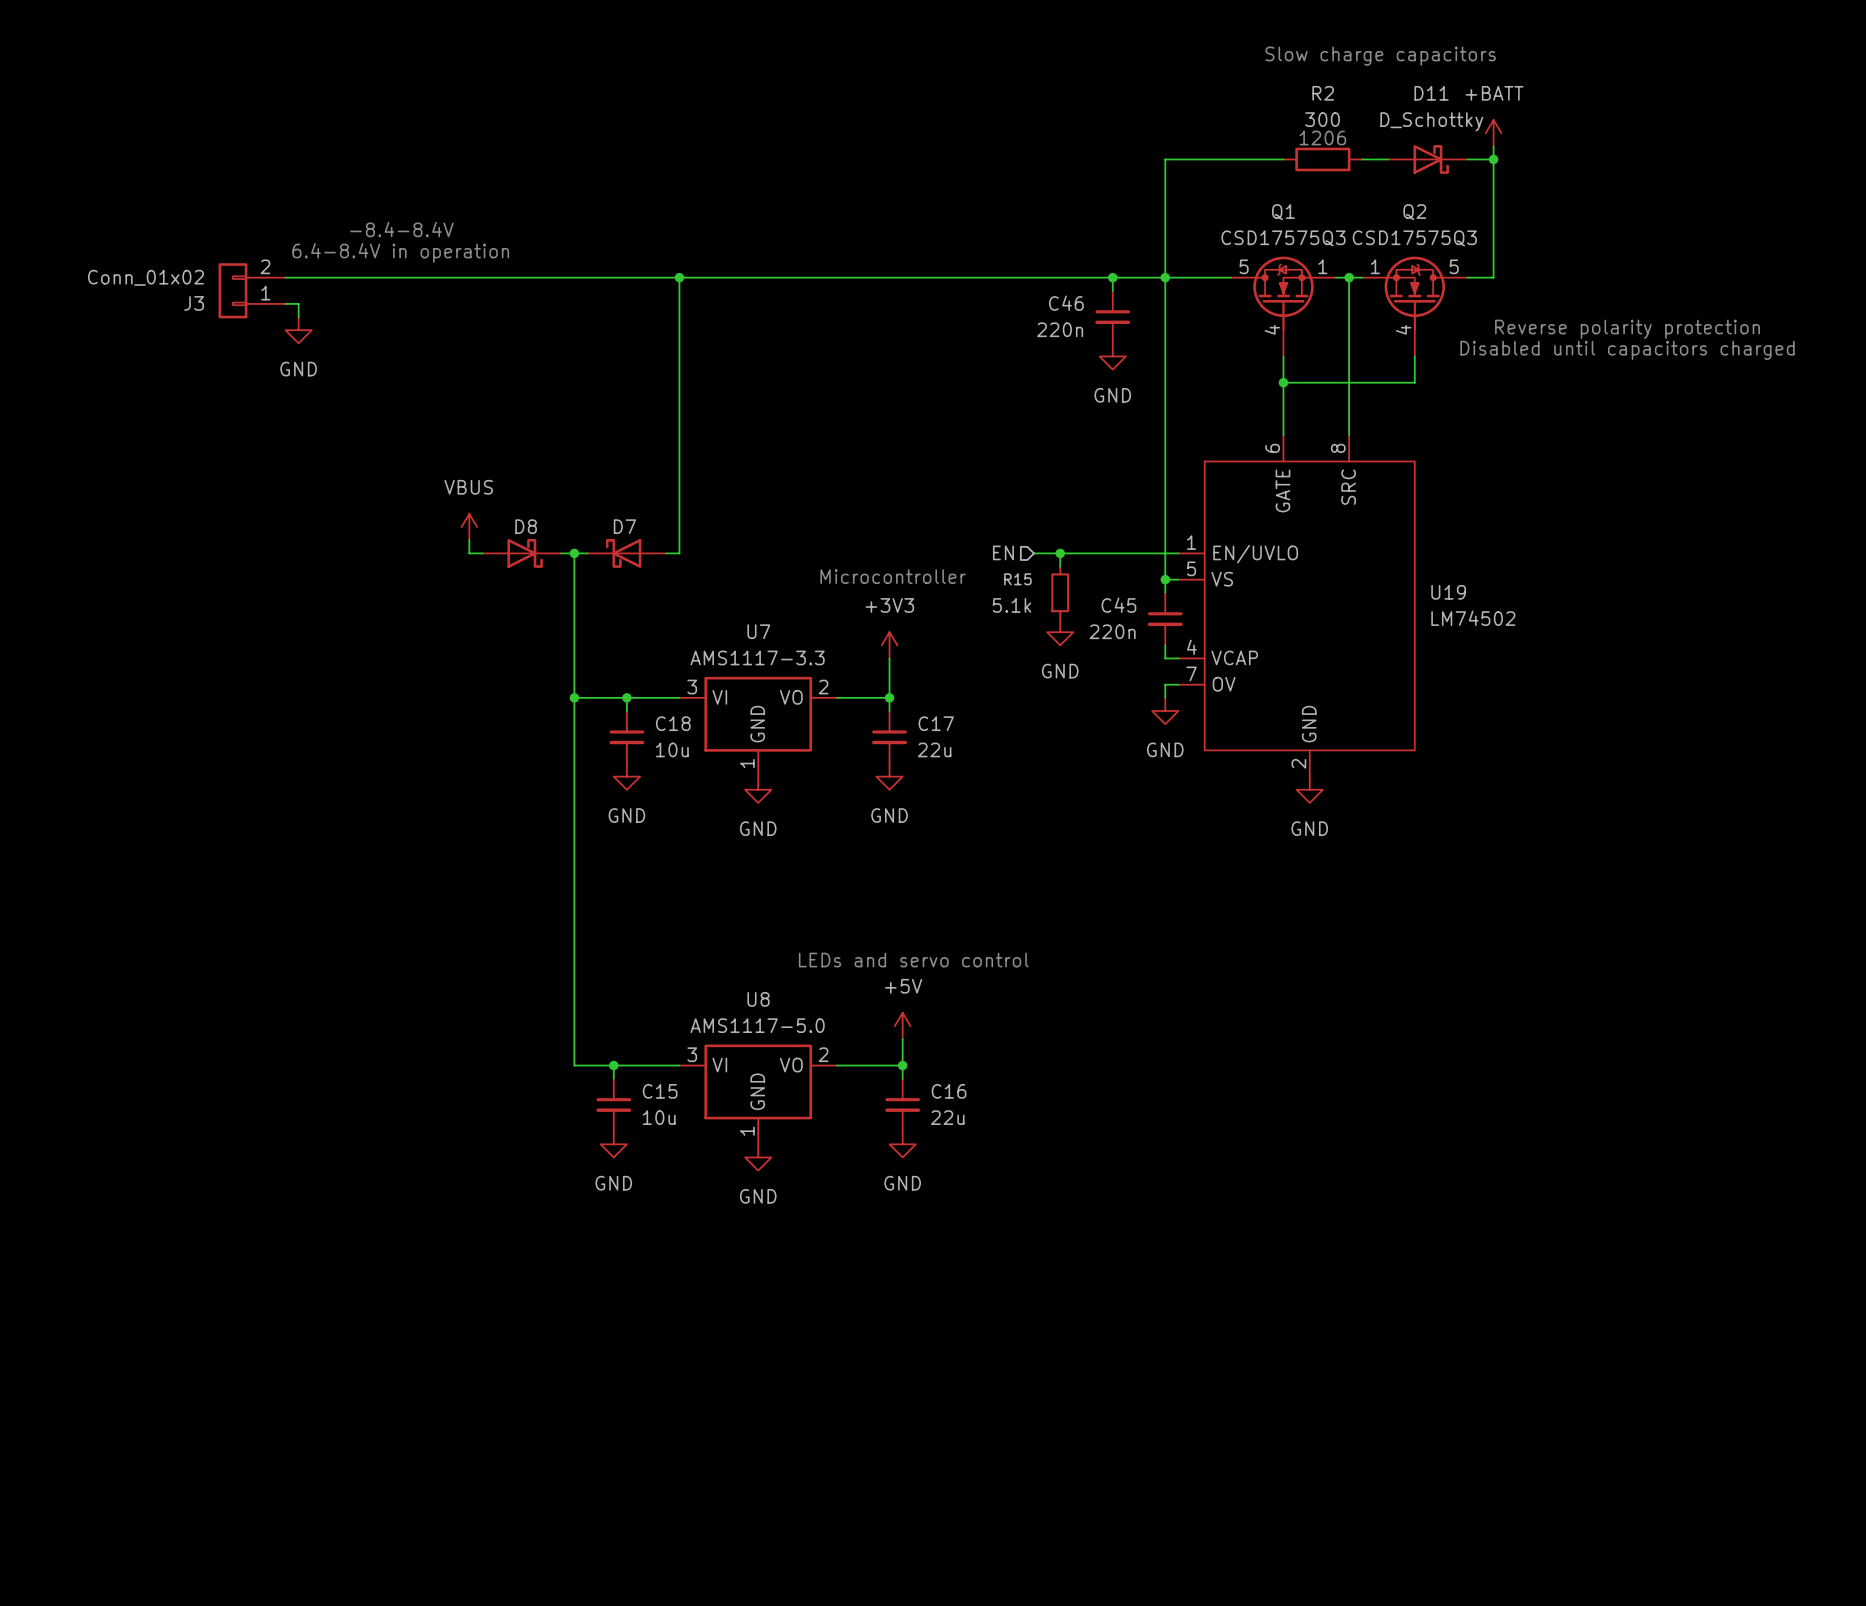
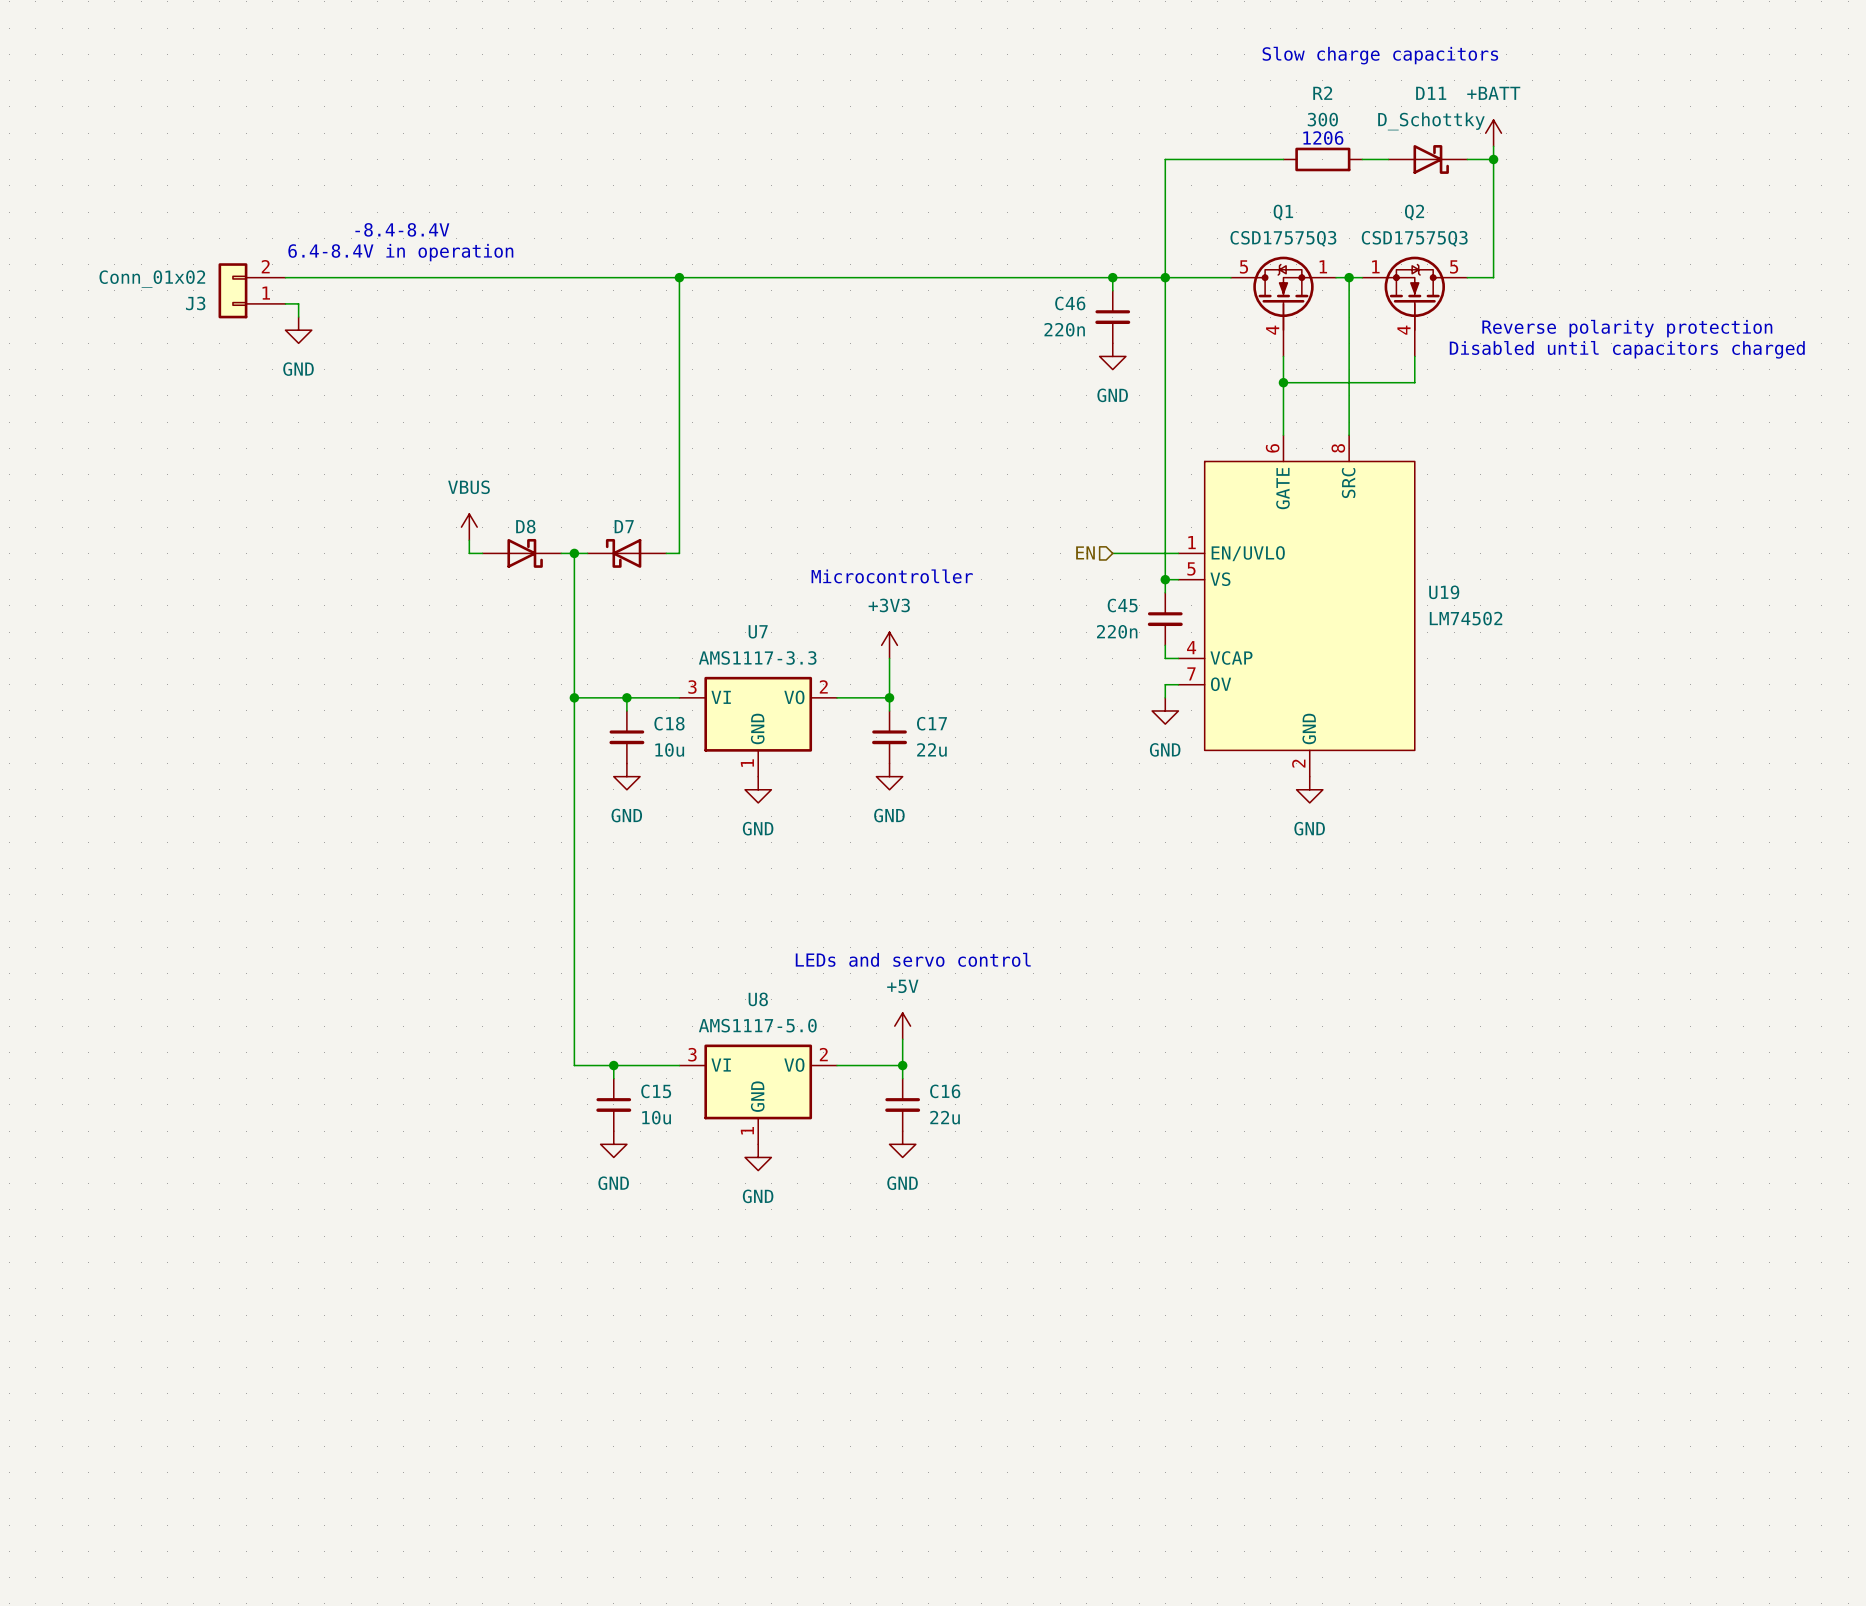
hierarchical label position: EN (1003, 552) -> EN (1085, 552)
wire: (1033, 553) (1112, 553) -> none
wire: (1060, 553) (1060, 566) -> none
junction: (1060, 553) -> none
R15: 5.1k (1060, 592) -> none
power symbol: GND (1060, 632) -> none

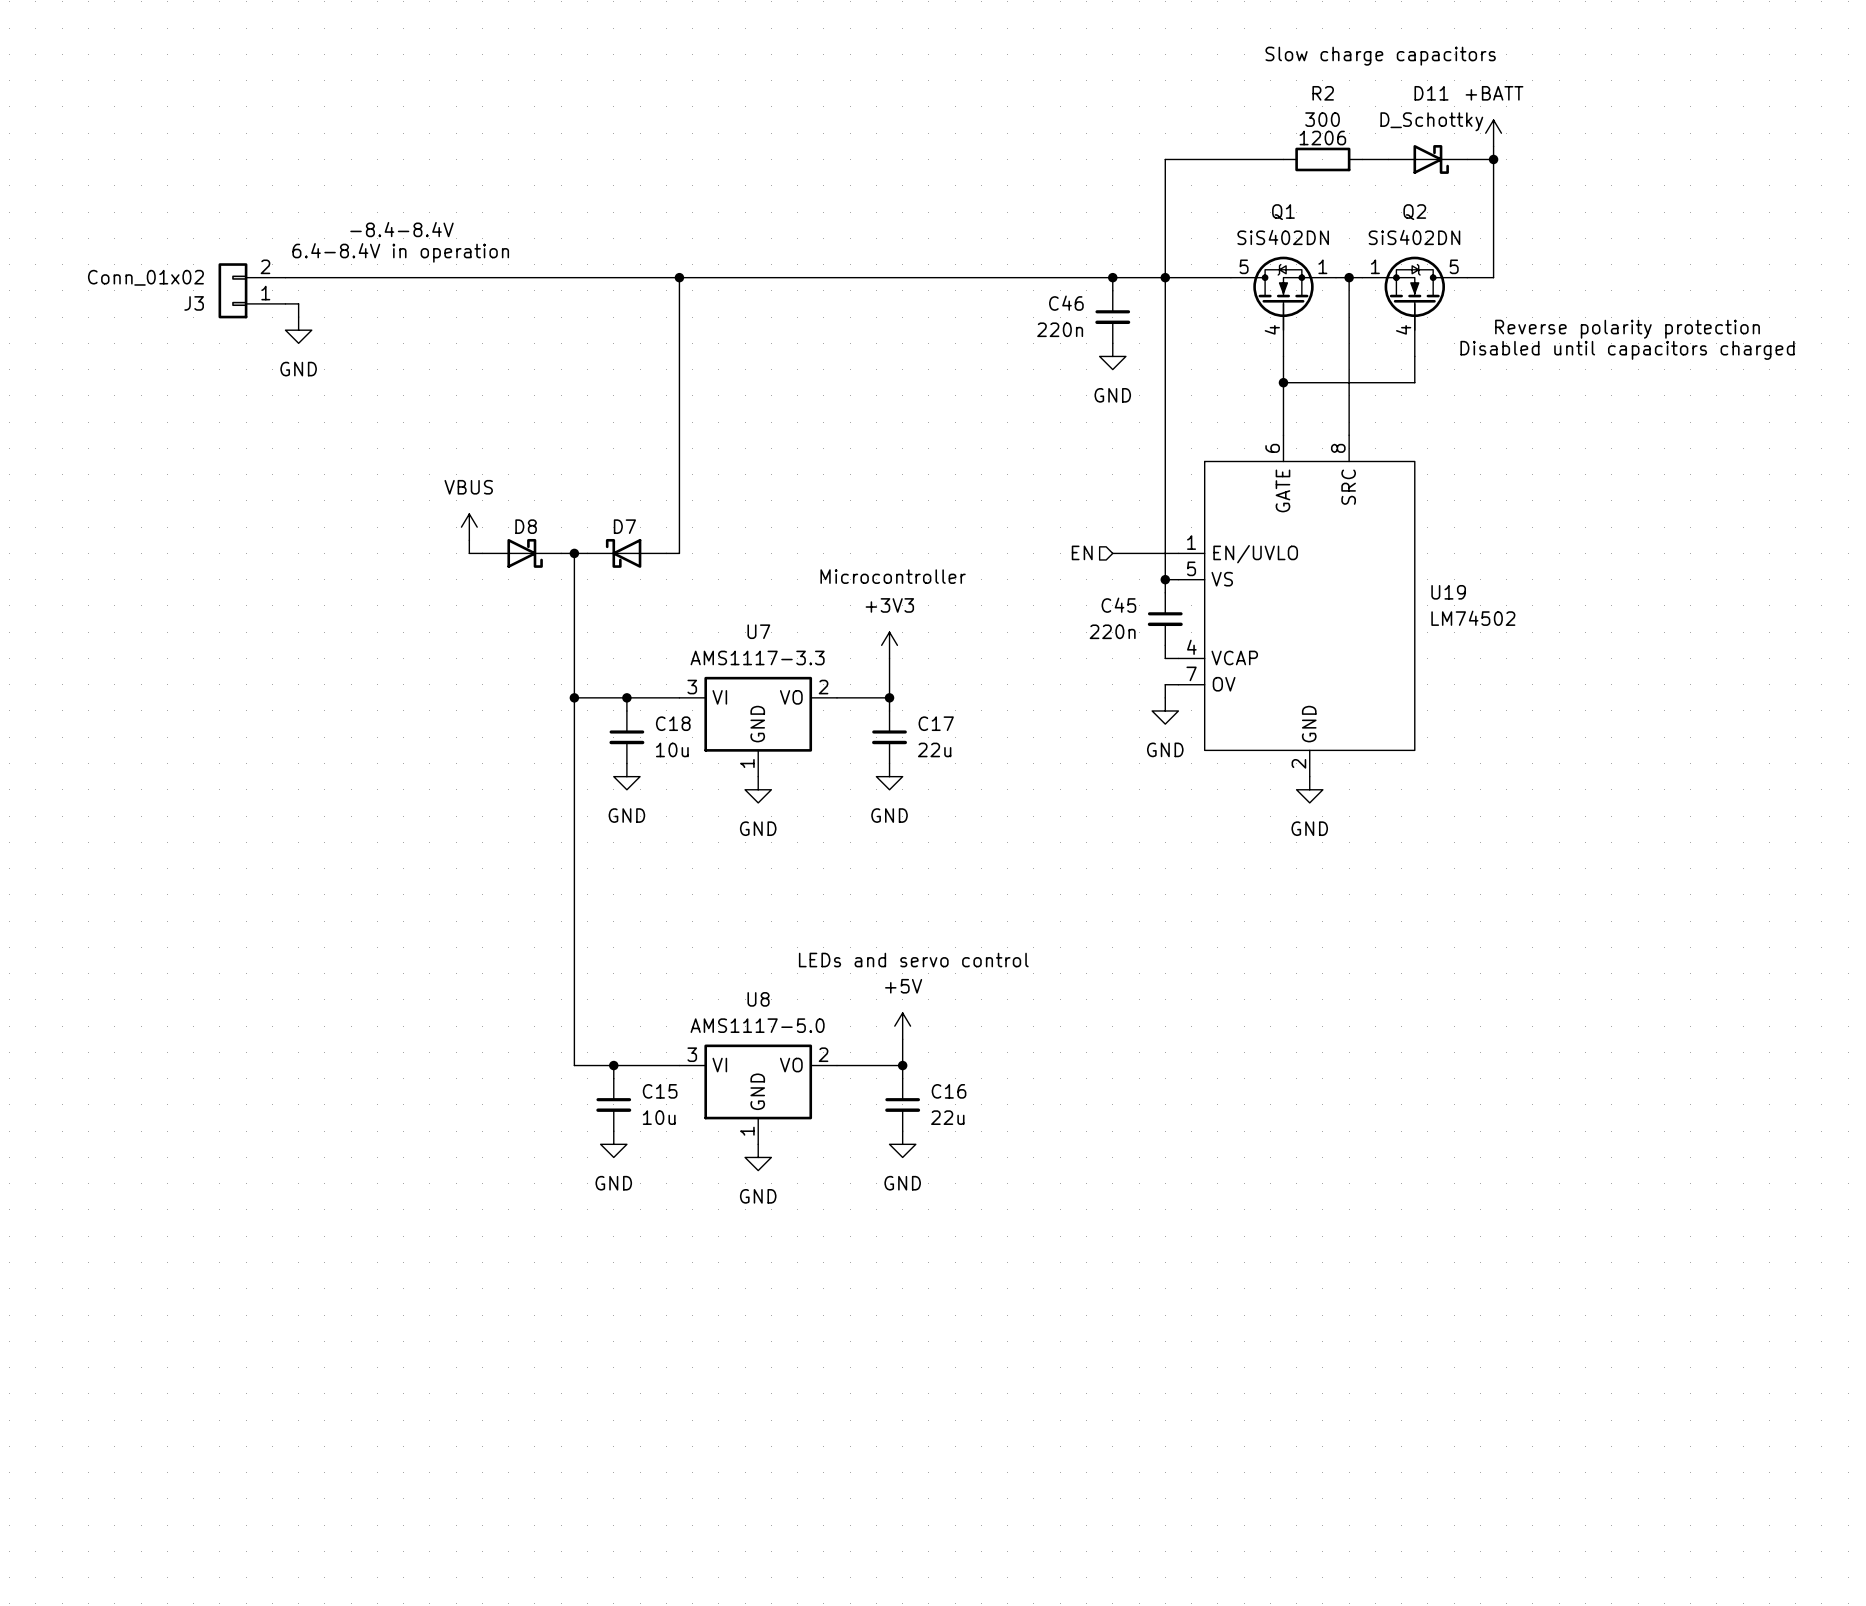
Q1 value: CSD17575Q3 (1283, 238) -> SiS402DN (1283, 237)
Q2 value: CSD17575Q3 (1414, 238) -> SiS402DN (1414, 237)

